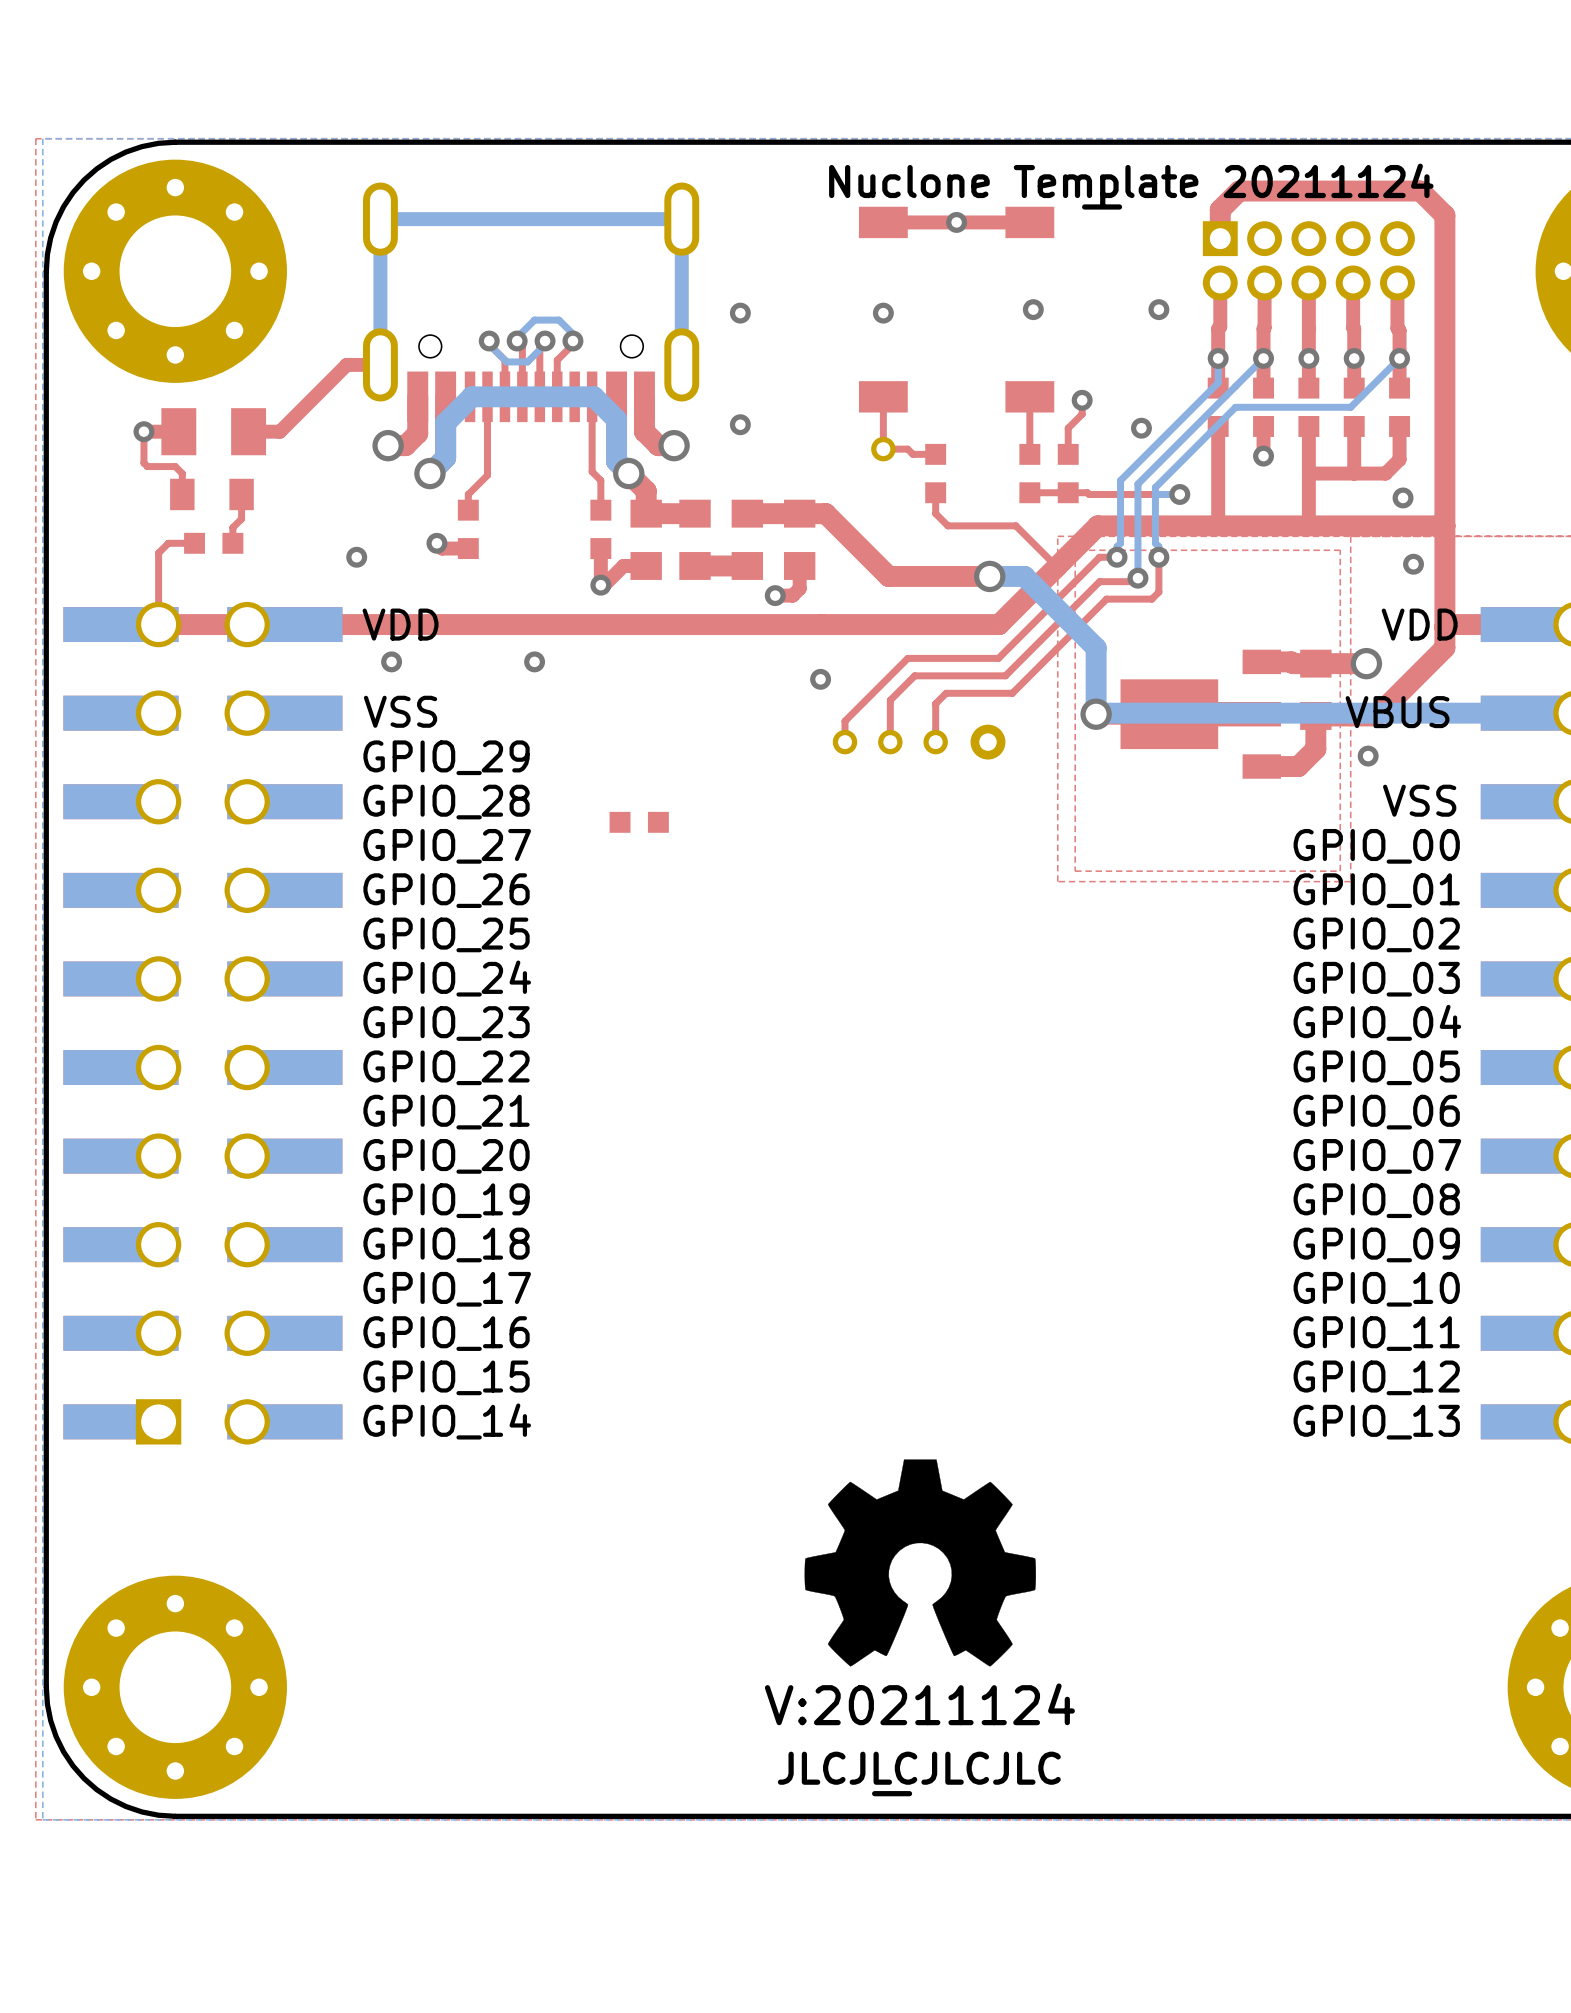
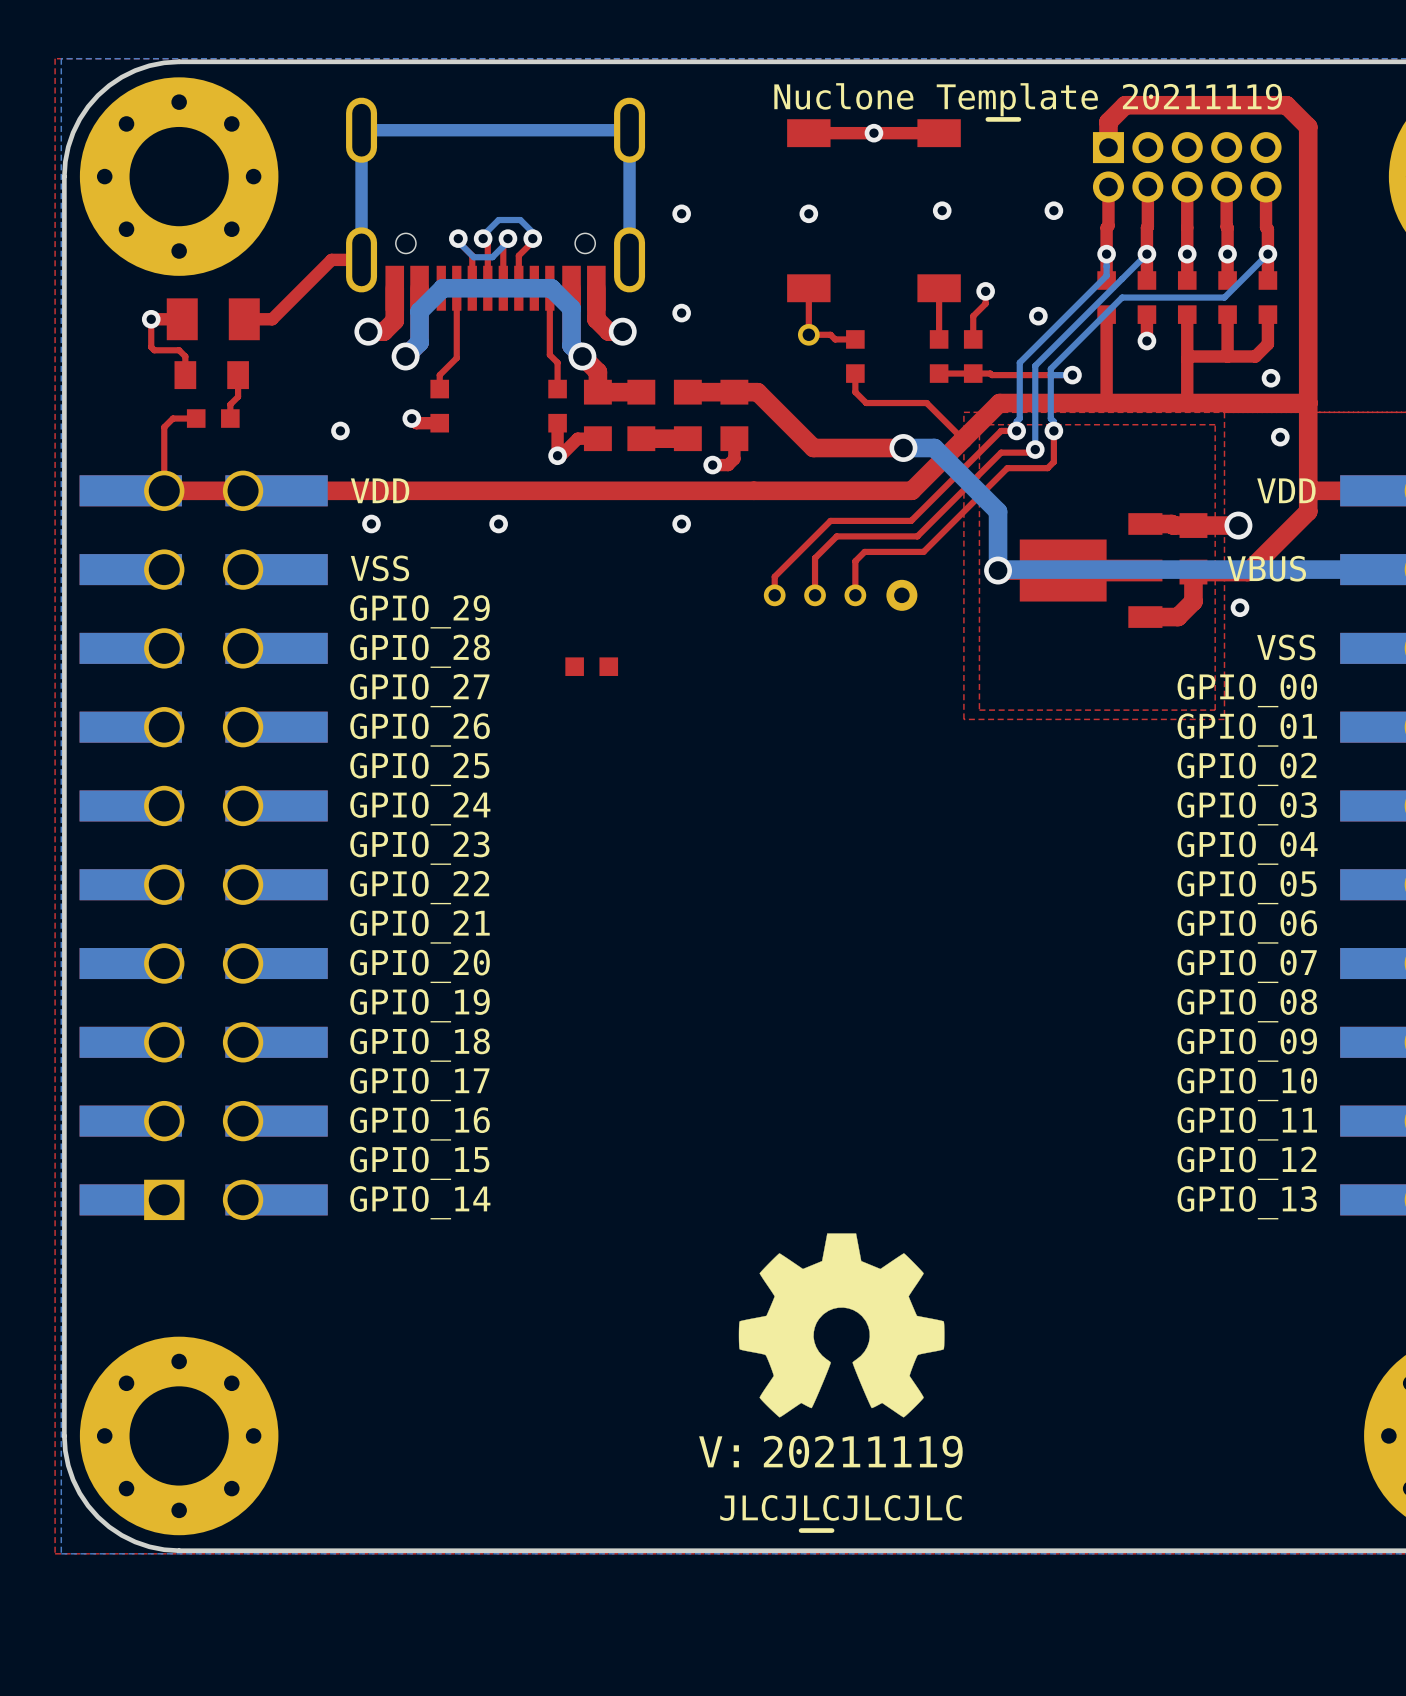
drawing shape: [829, 163, 1434, 210] -> [774, 83, 1283, 122]
via position: (820, 679) -> (681, 524)
drawing shape: [764, 1683, 1075, 1726] -> [699, 1435, 963, 1468]

